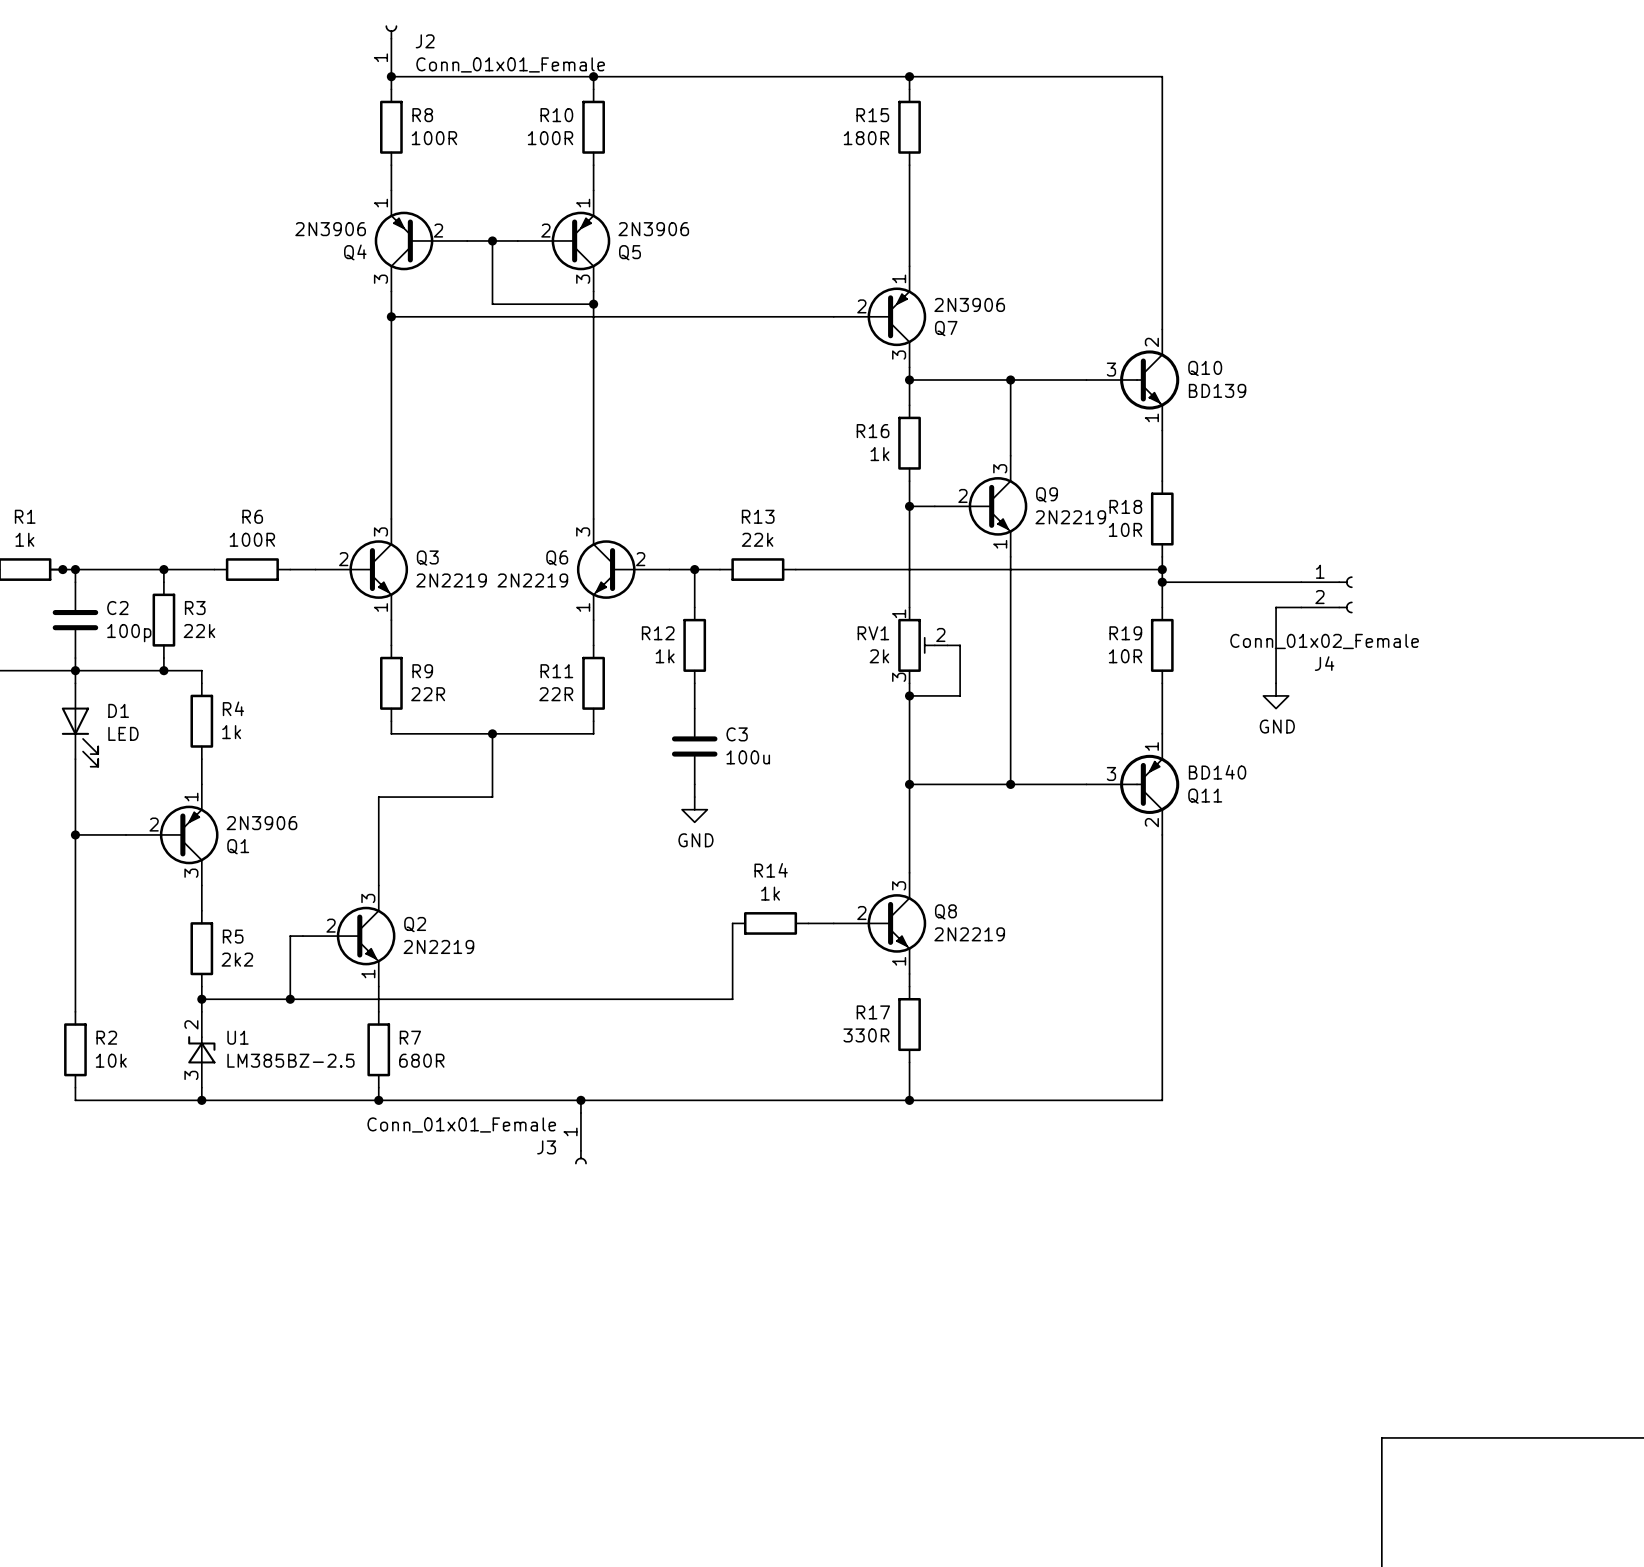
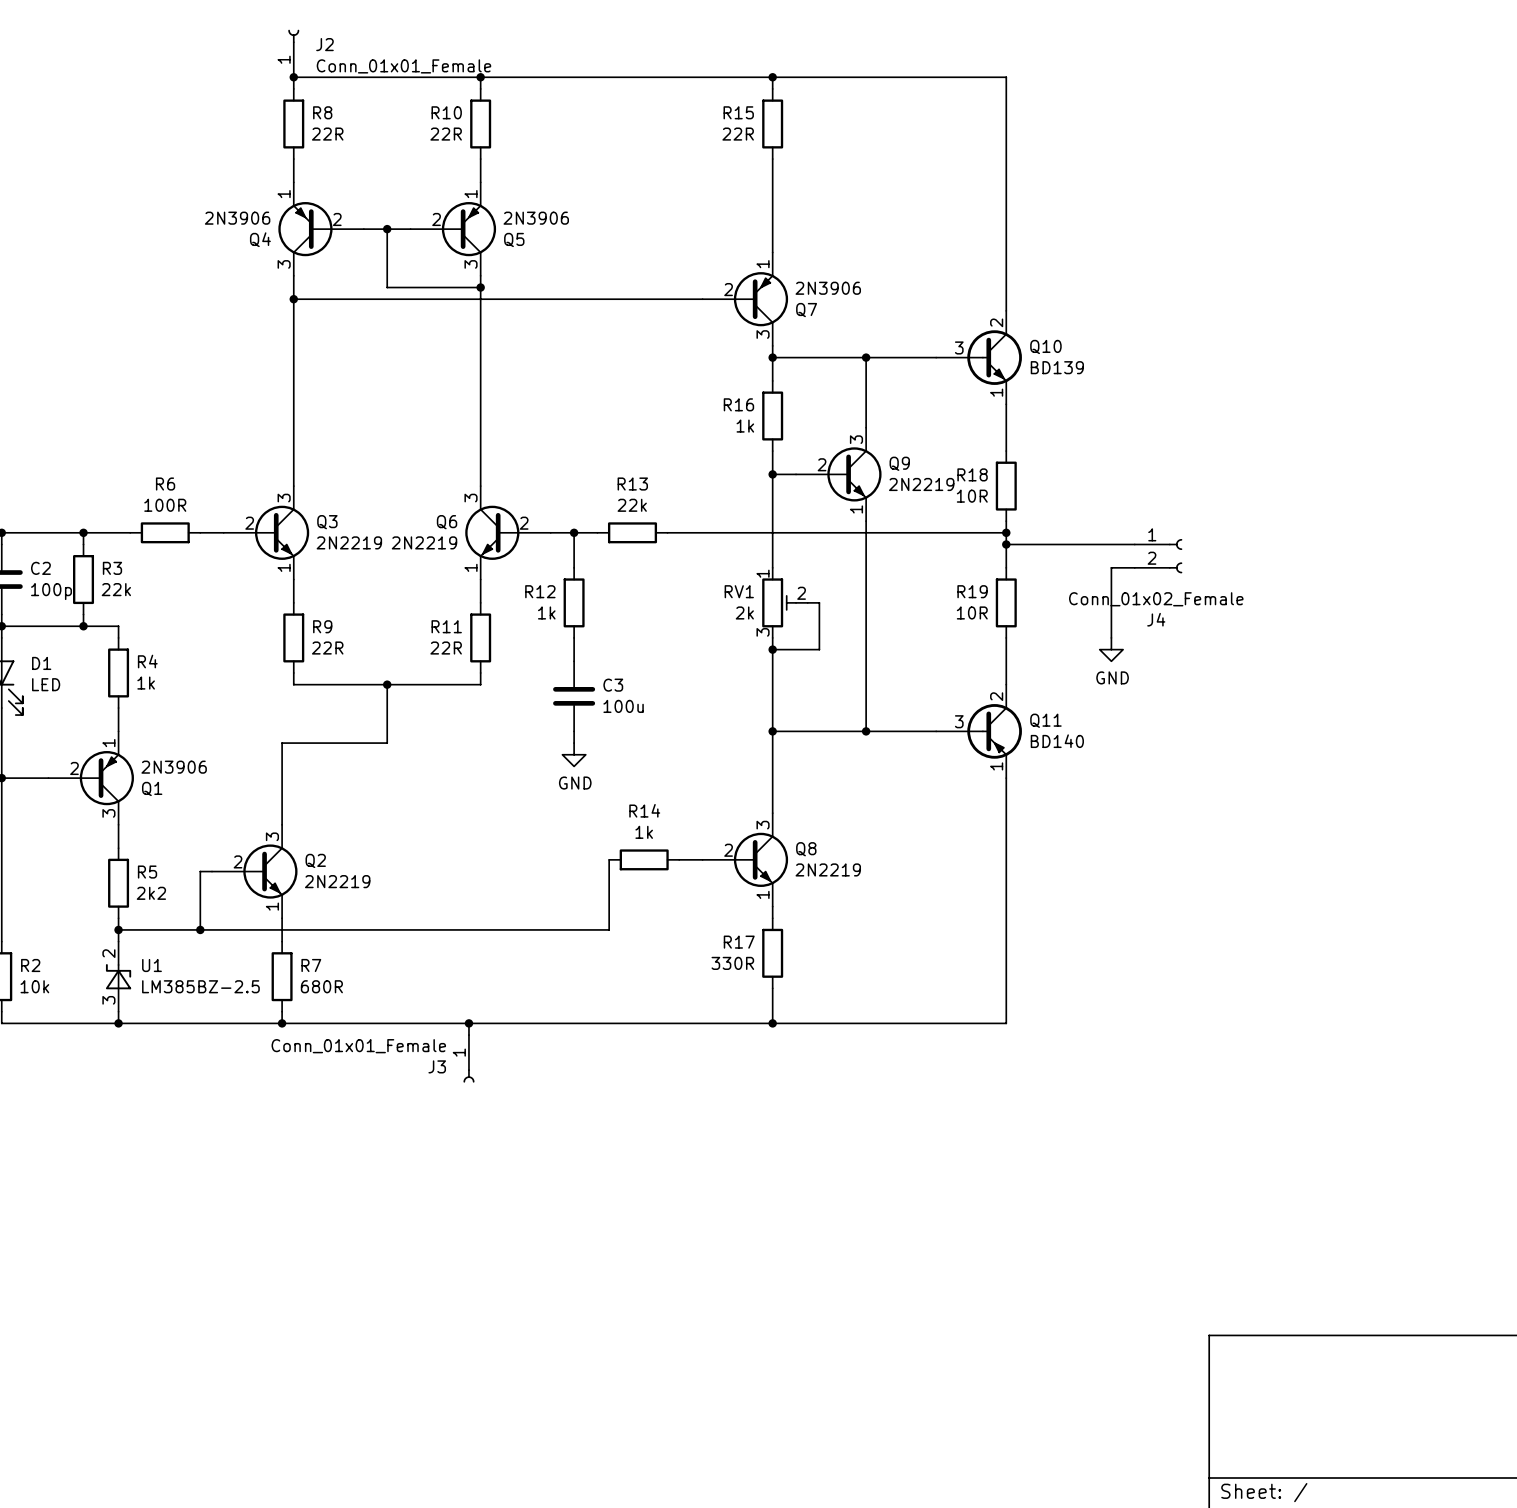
R8 value: 100R (434, 138) -> 22R (327, 134)
R10 value: 100R (550, 138) -> 22R (446, 134)
R15 value: 180R (866, 138) -> 22R (738, 134)
Q11 flip: as is (1149, 784) -> up-down (994, 731)

